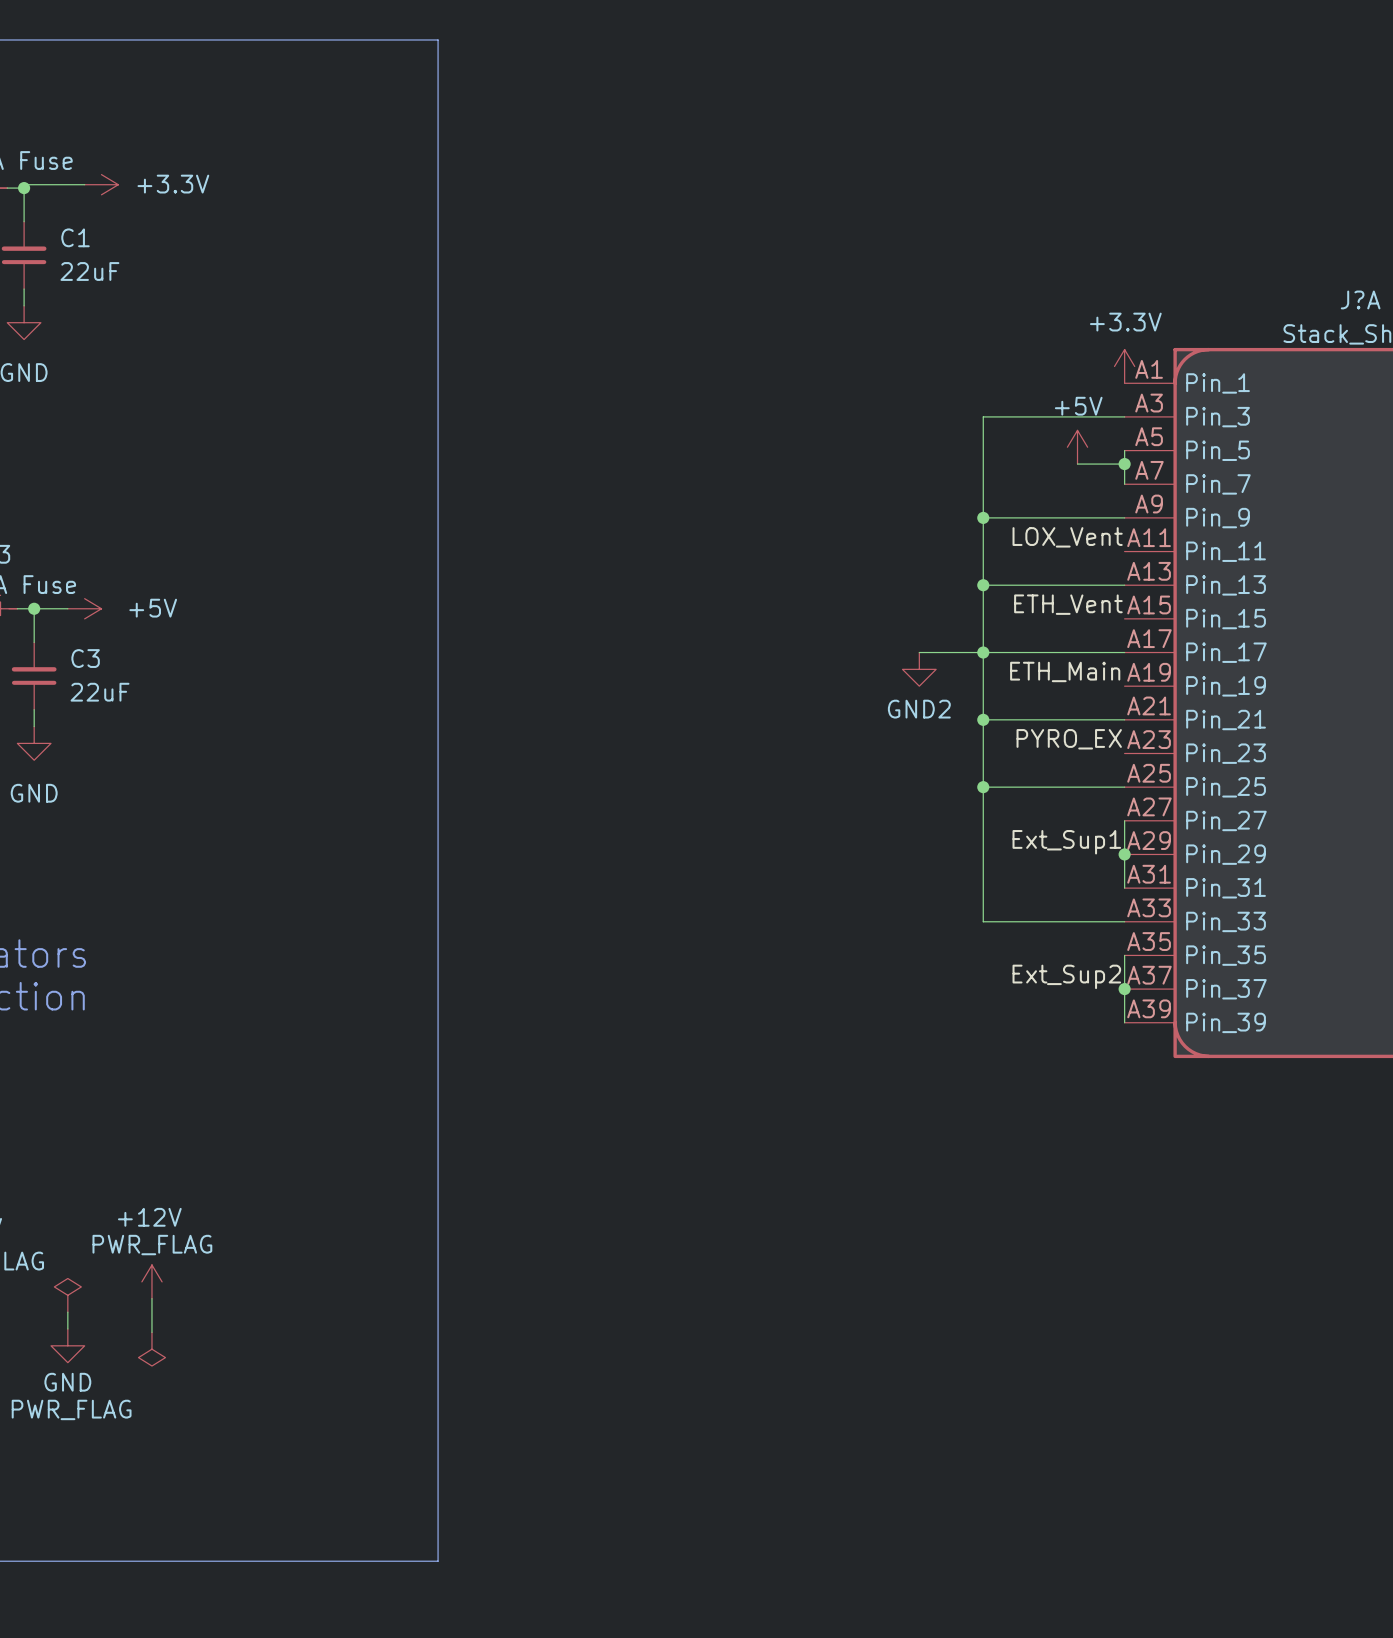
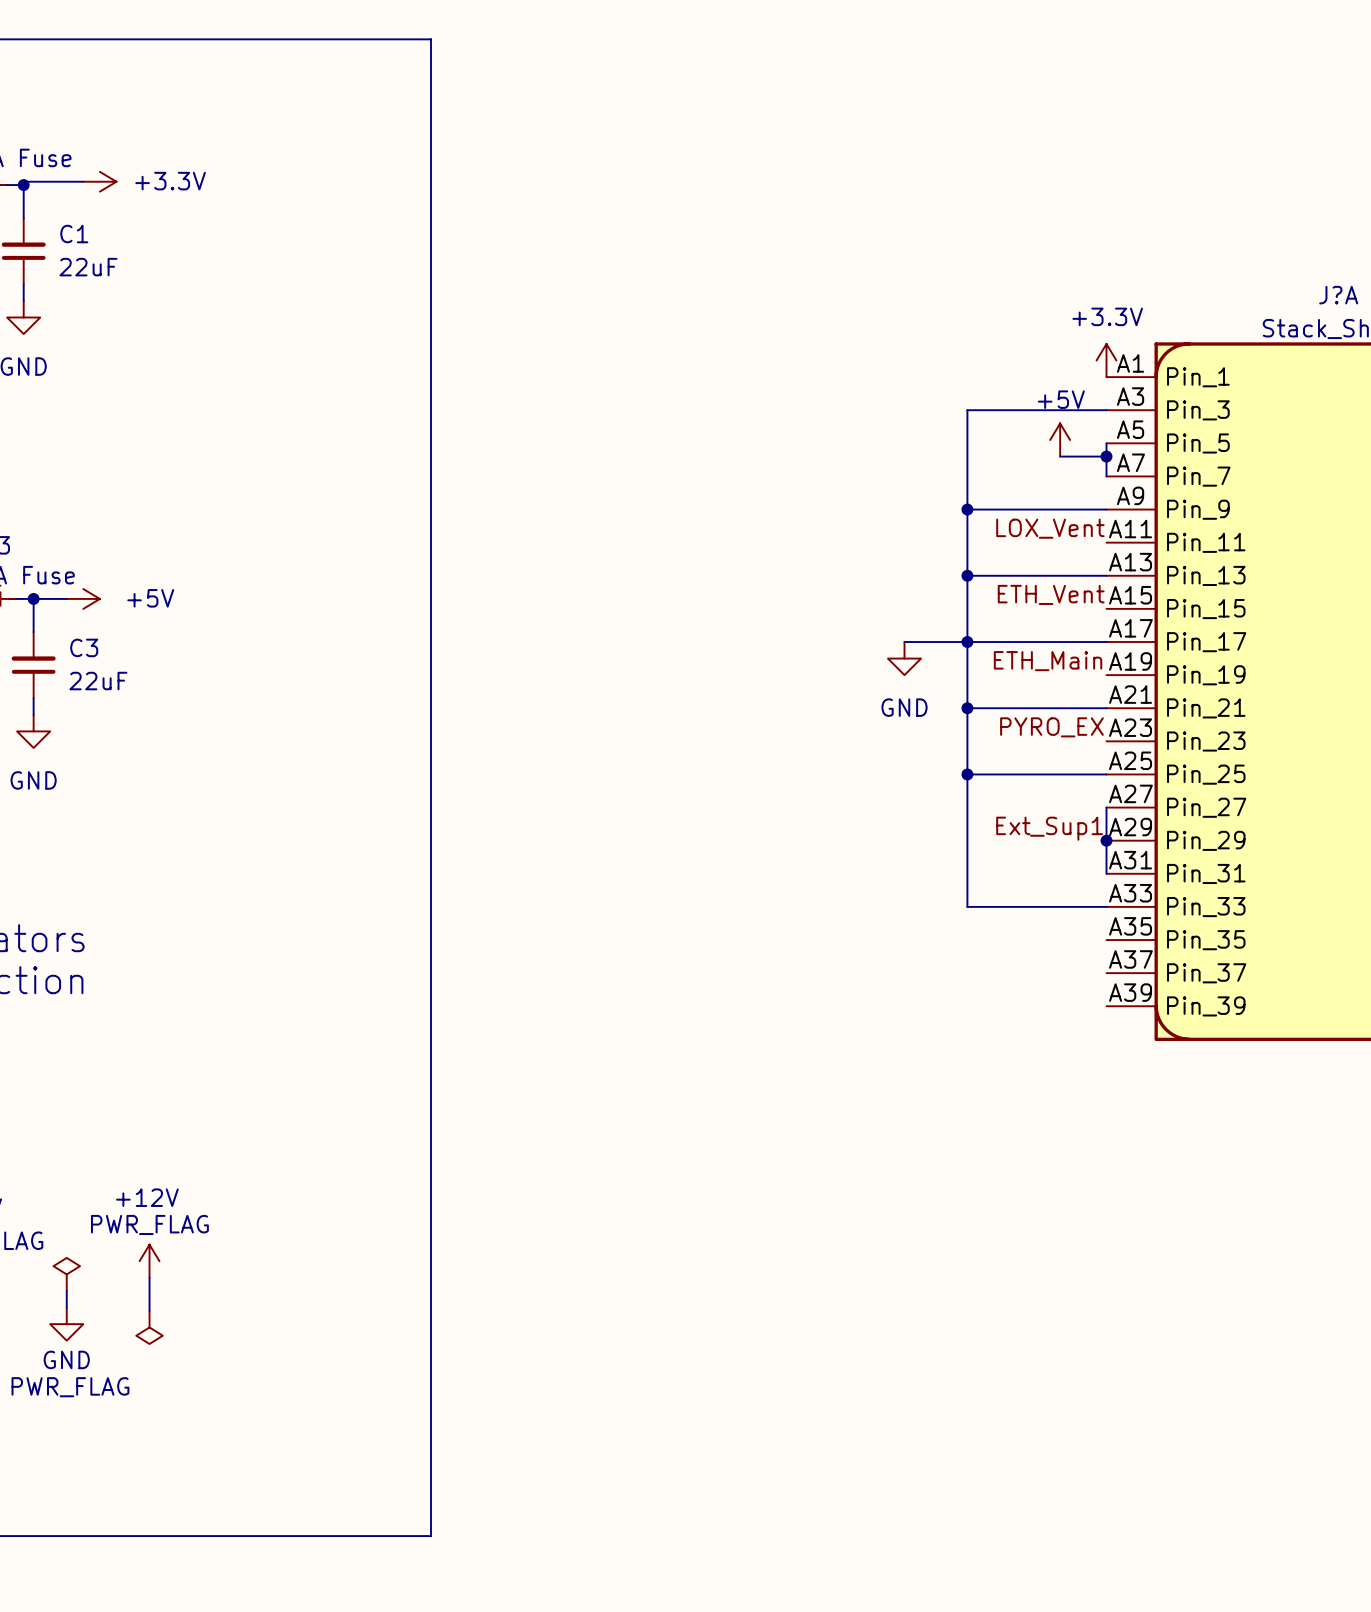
power symbol: GND2 (919, 669) -> GND (904, 658)
wire: (1124, 955) (1124, 1022) -> none
label: Ext_Sup2 (1066, 976) -> none
junction: (1124, 989) -> none

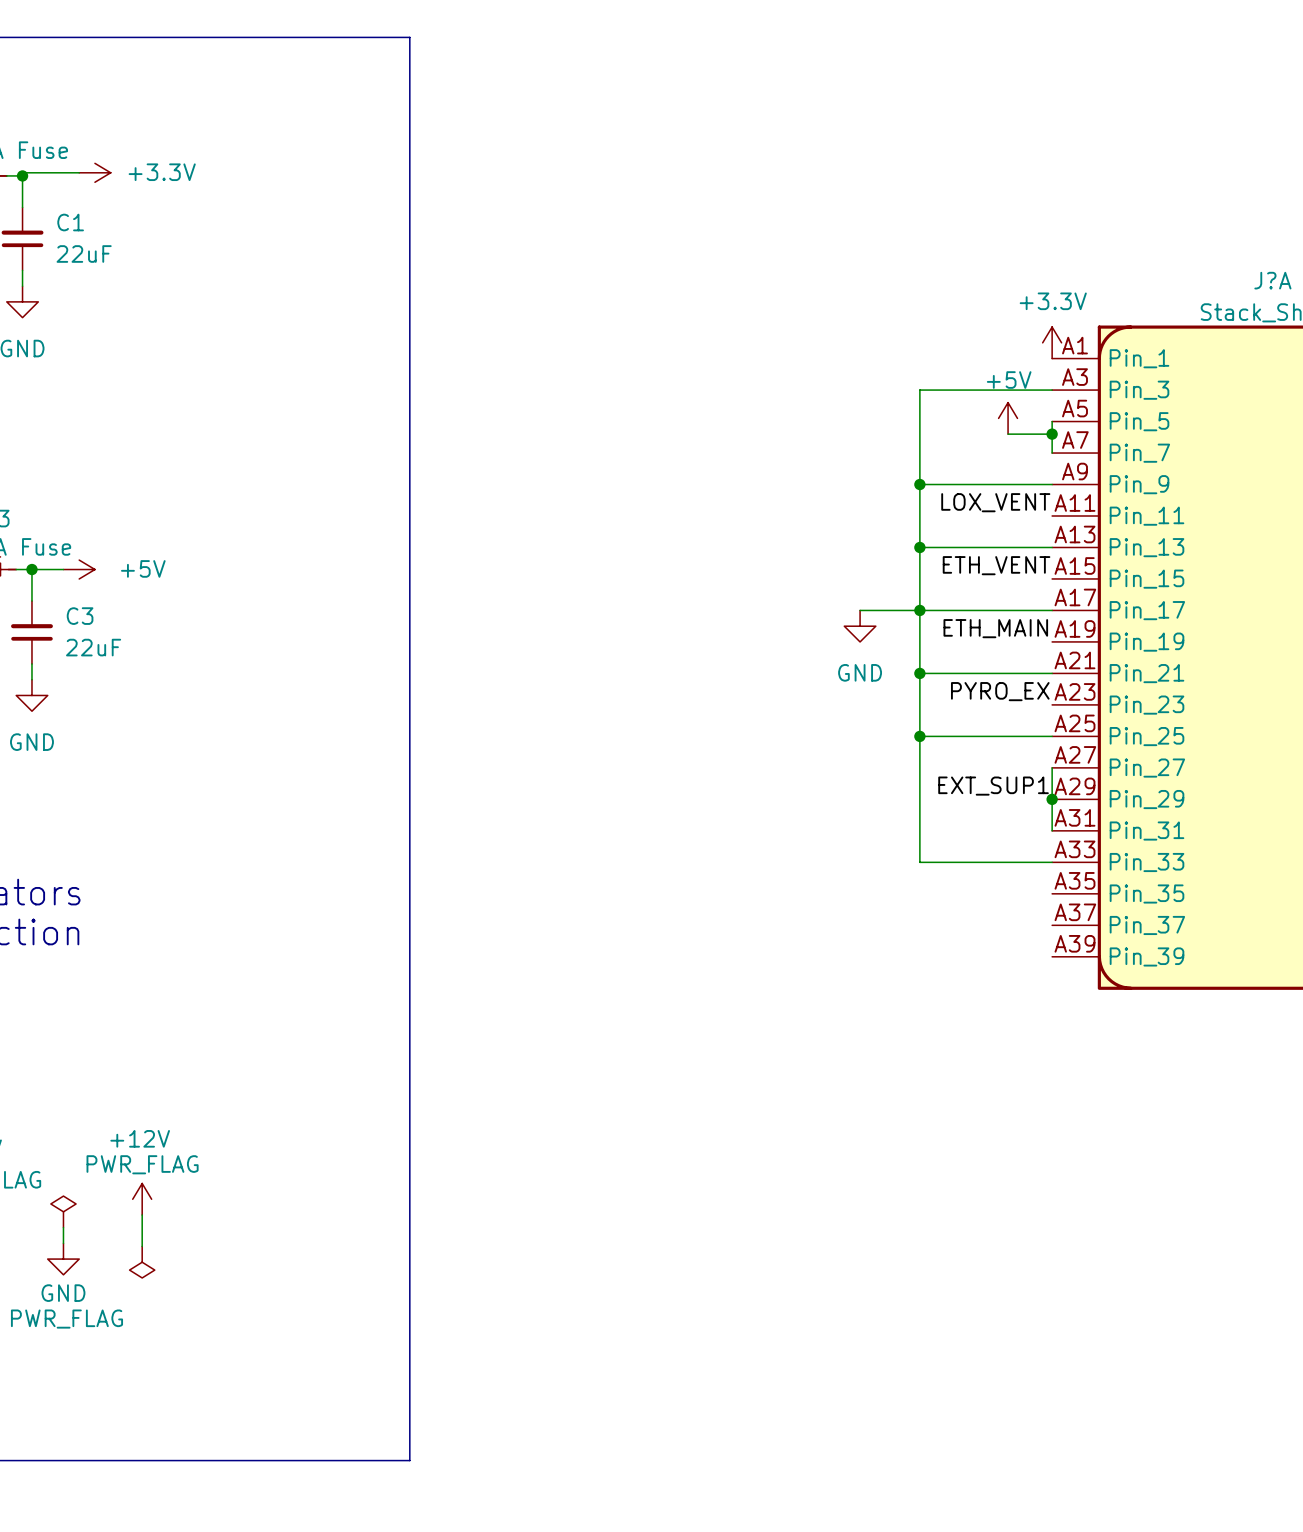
label: LOX_Vent (1050, 528) -> LOX_VENT (995, 502)
label: ETH_Vent (1051, 594) -> ETH_VENT (996, 565)
label: ETH_Main (1048, 661) -> ETH_MAIN (995, 628)
label: Ext_Sup1 (1049, 828) -> EXT_SUP1 (993, 786)

